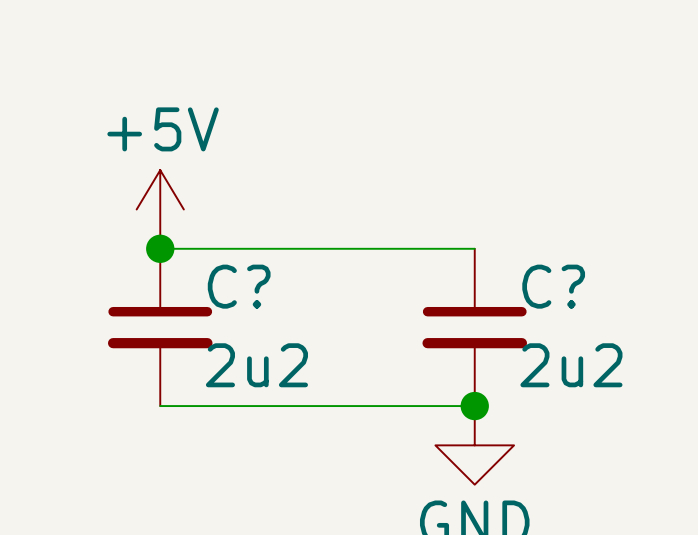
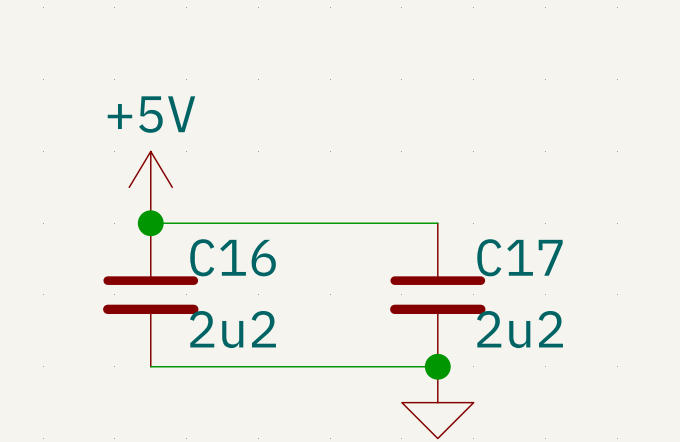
C? name: C? (239, 286) -> C16 (233, 257)
C? name: C? (553, 286) -> C17 (519, 257)

